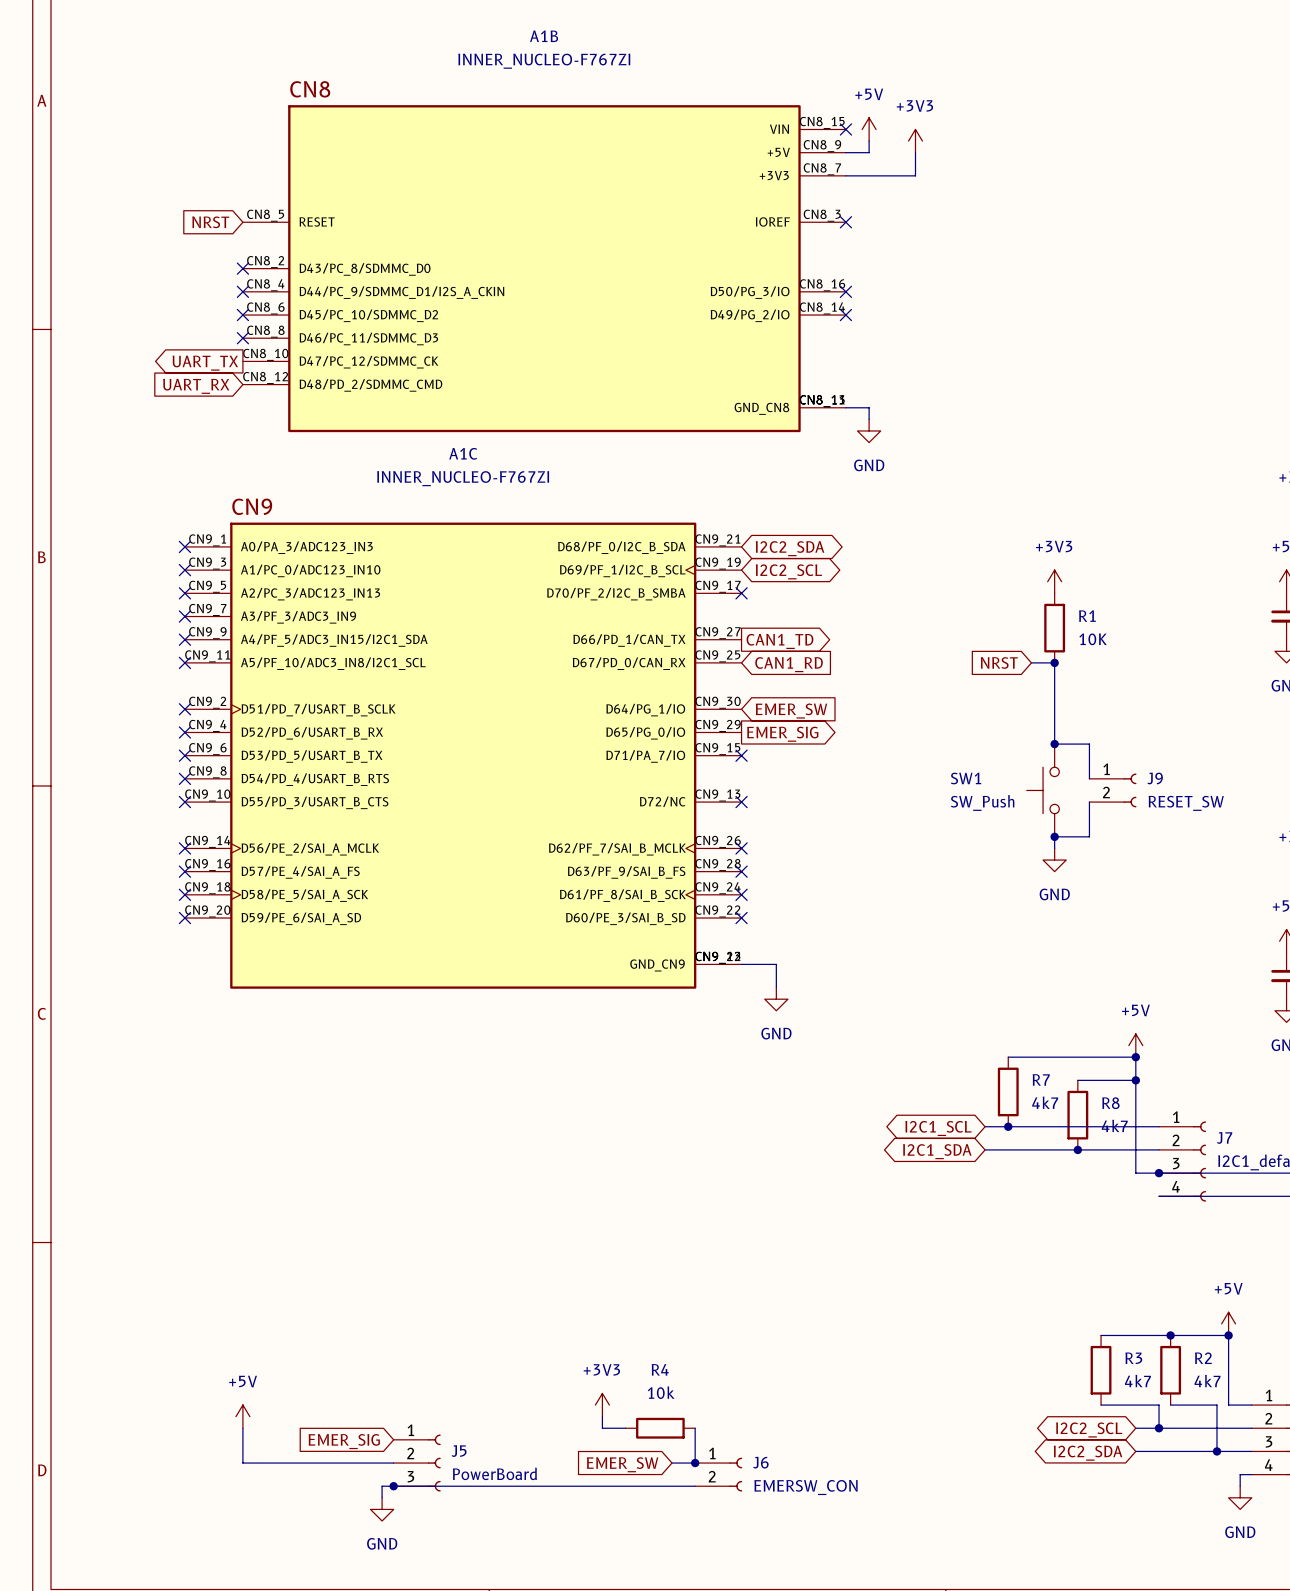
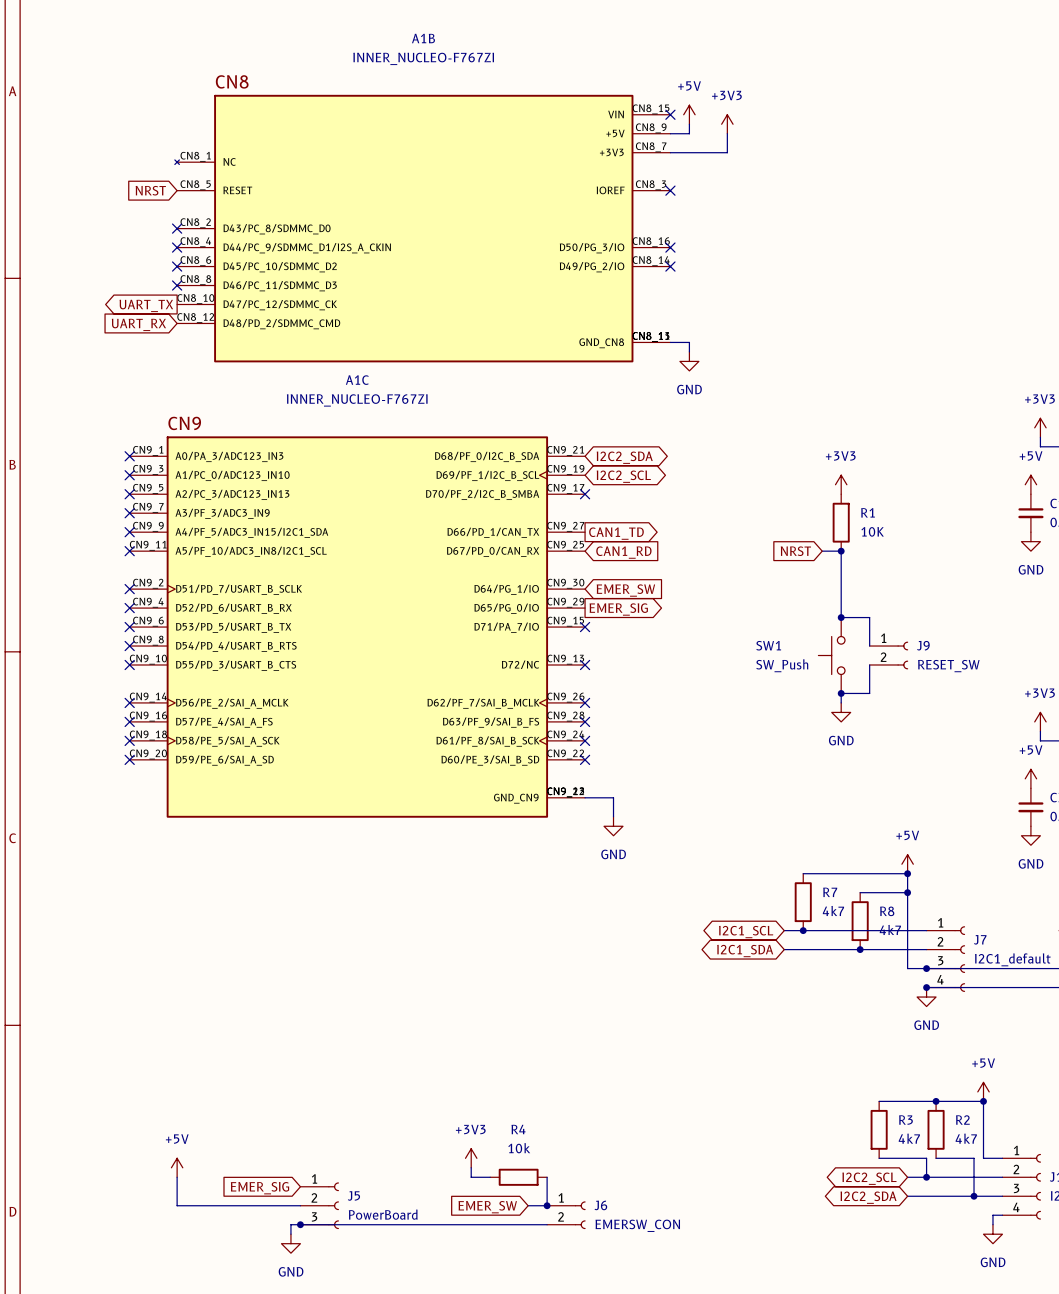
A1B symbol: [242, 105, 846, 433] -> [174, 94, 671, 363]
junction: none -> (926, 987)
power symbol: none -> GND (926, 997)

